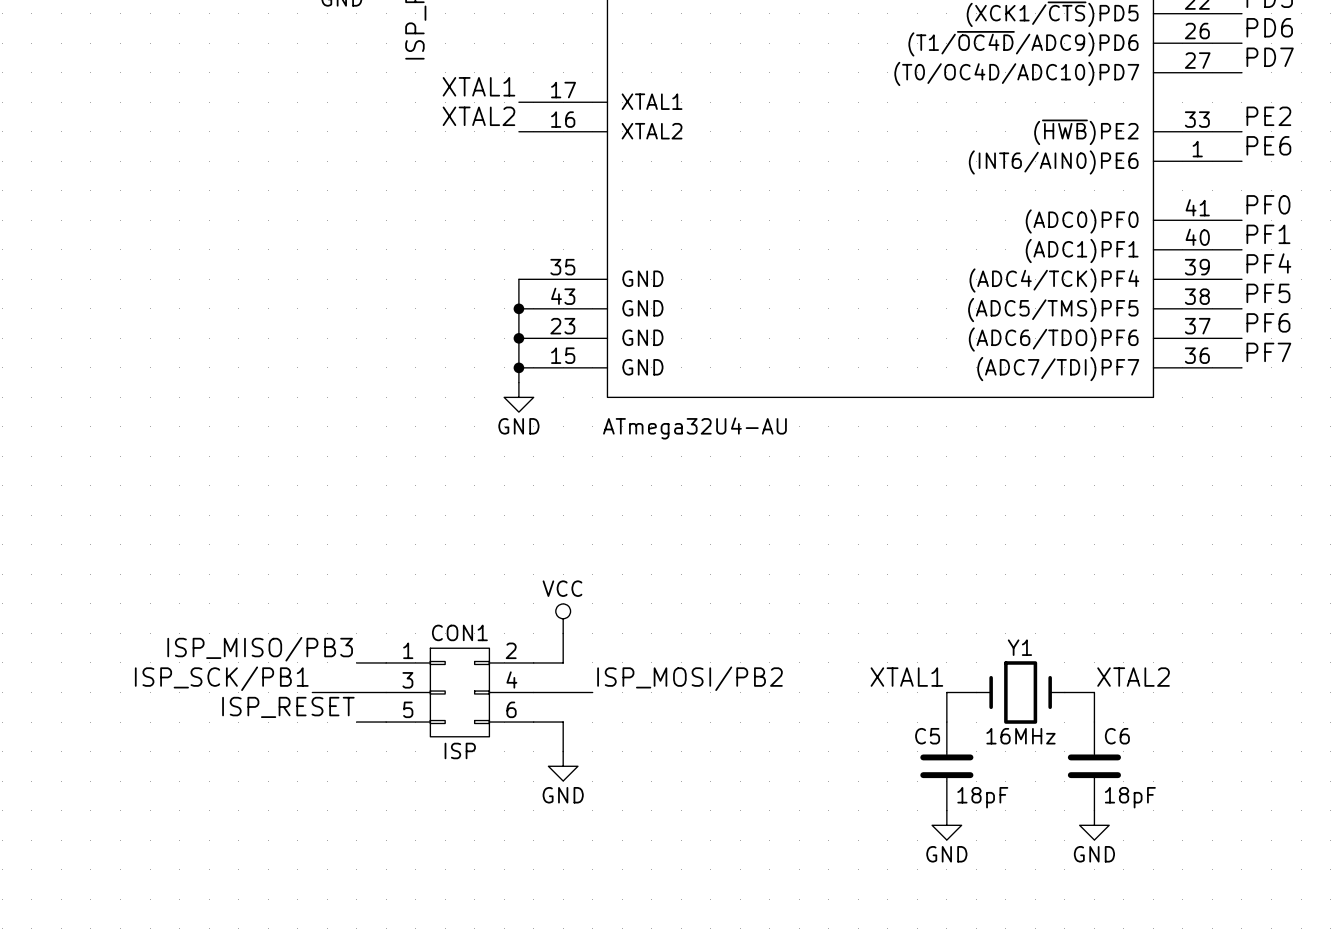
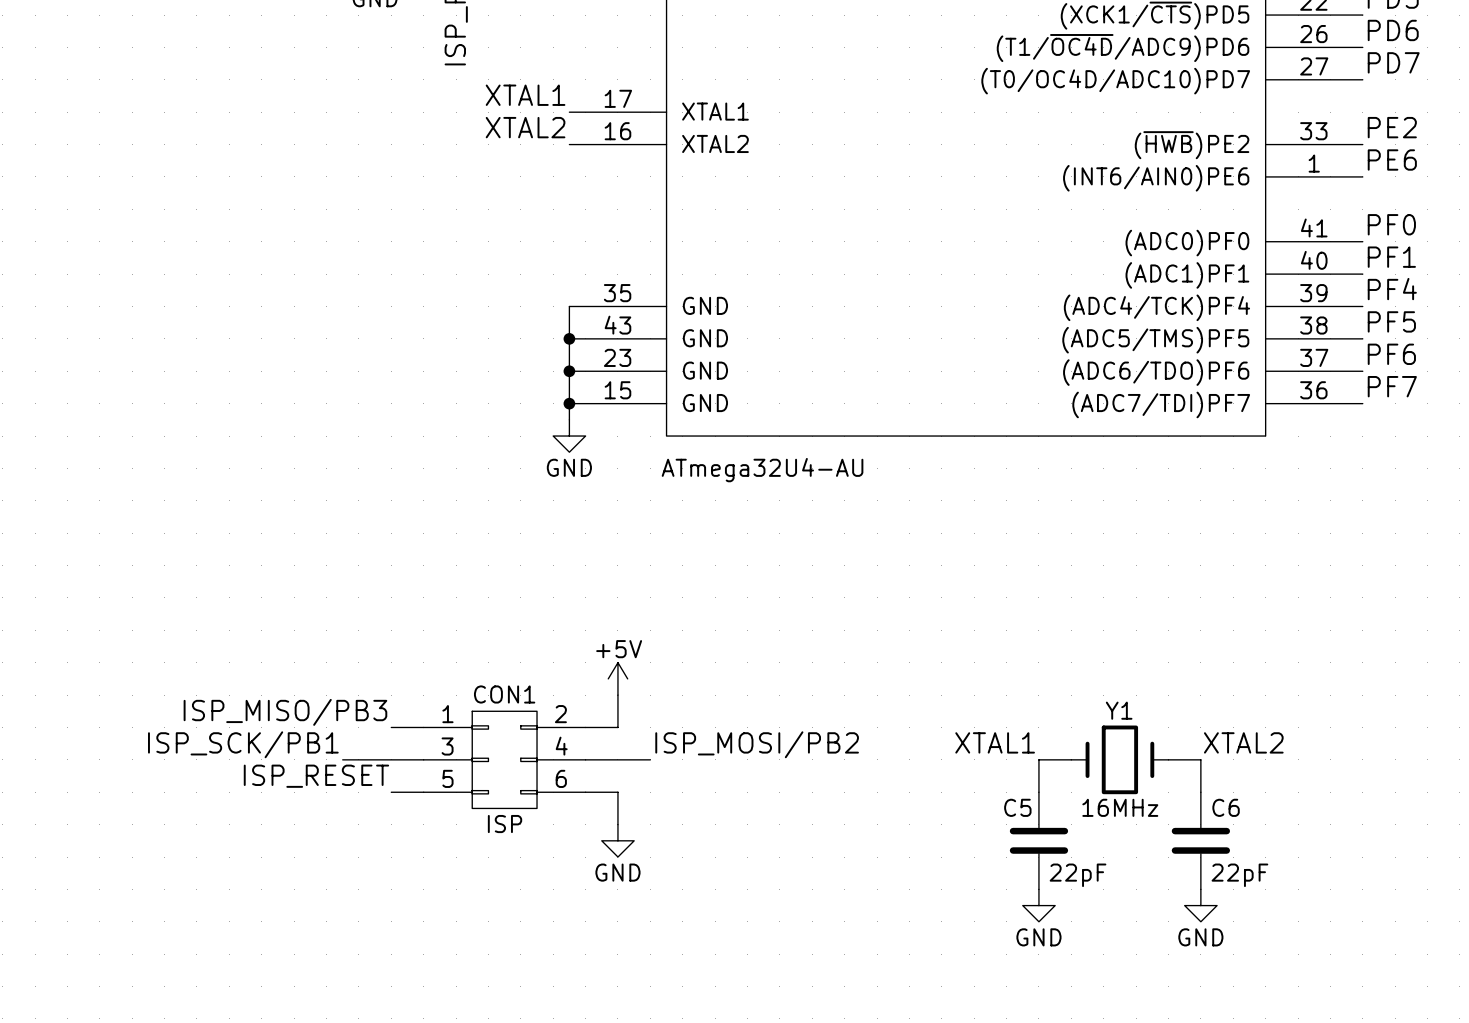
power symbol: VCC (563, 618) -> +5V (617, 678)
C5 value: 18pF (982, 797) -> 22pF (1078, 875)
C6 value: 18pF (1130, 797) -> 22pF (1239, 875)

